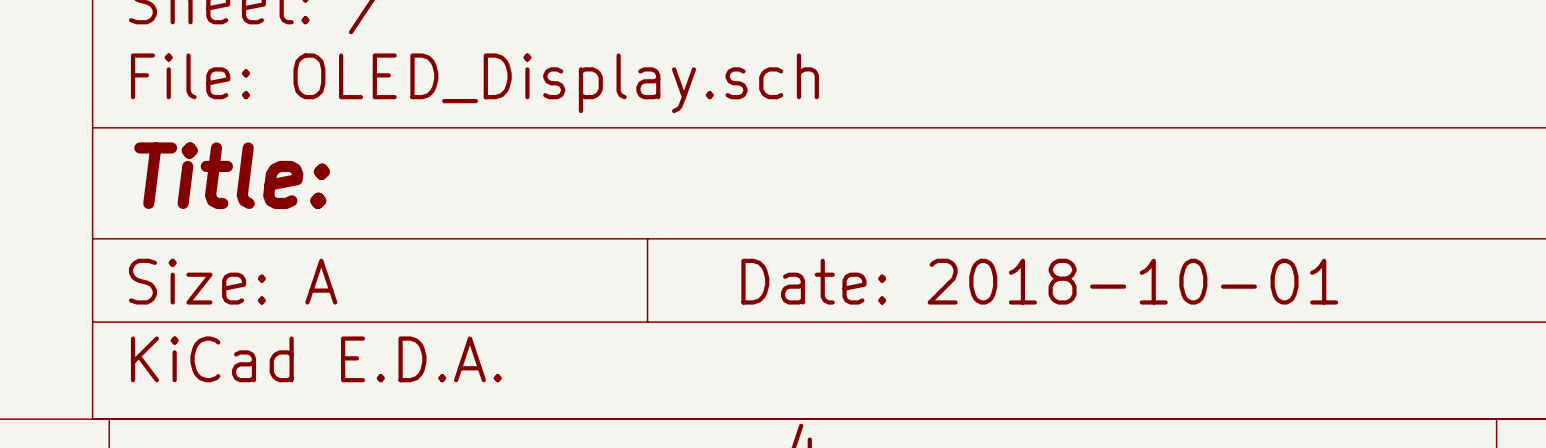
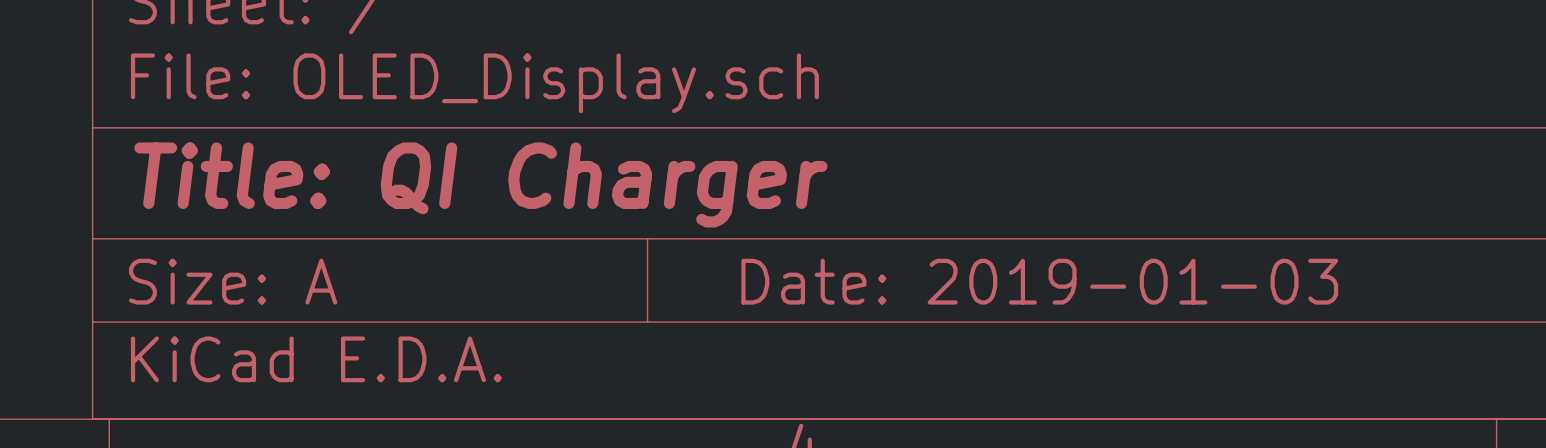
title block: Title: (232, 175) -> Title: QI Charger (480, 184)
title block: Date: 2018-10-01 (1039, 281) -> Date: 2019-01-03 (1039, 281)

